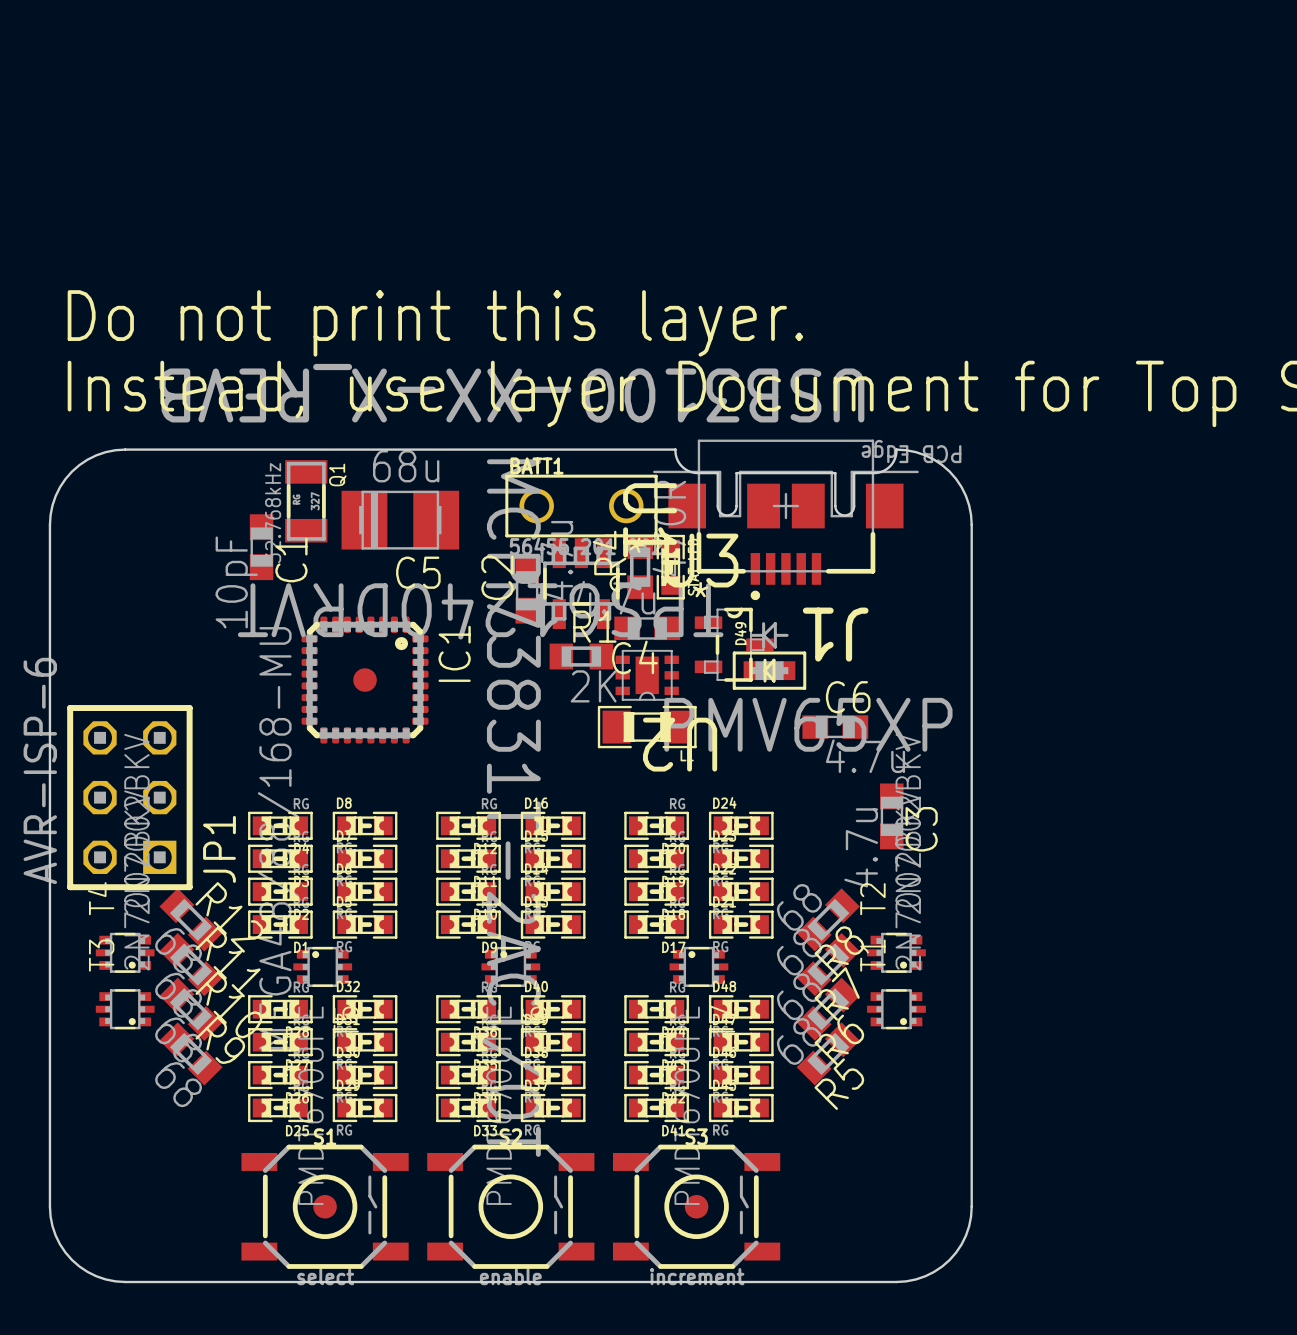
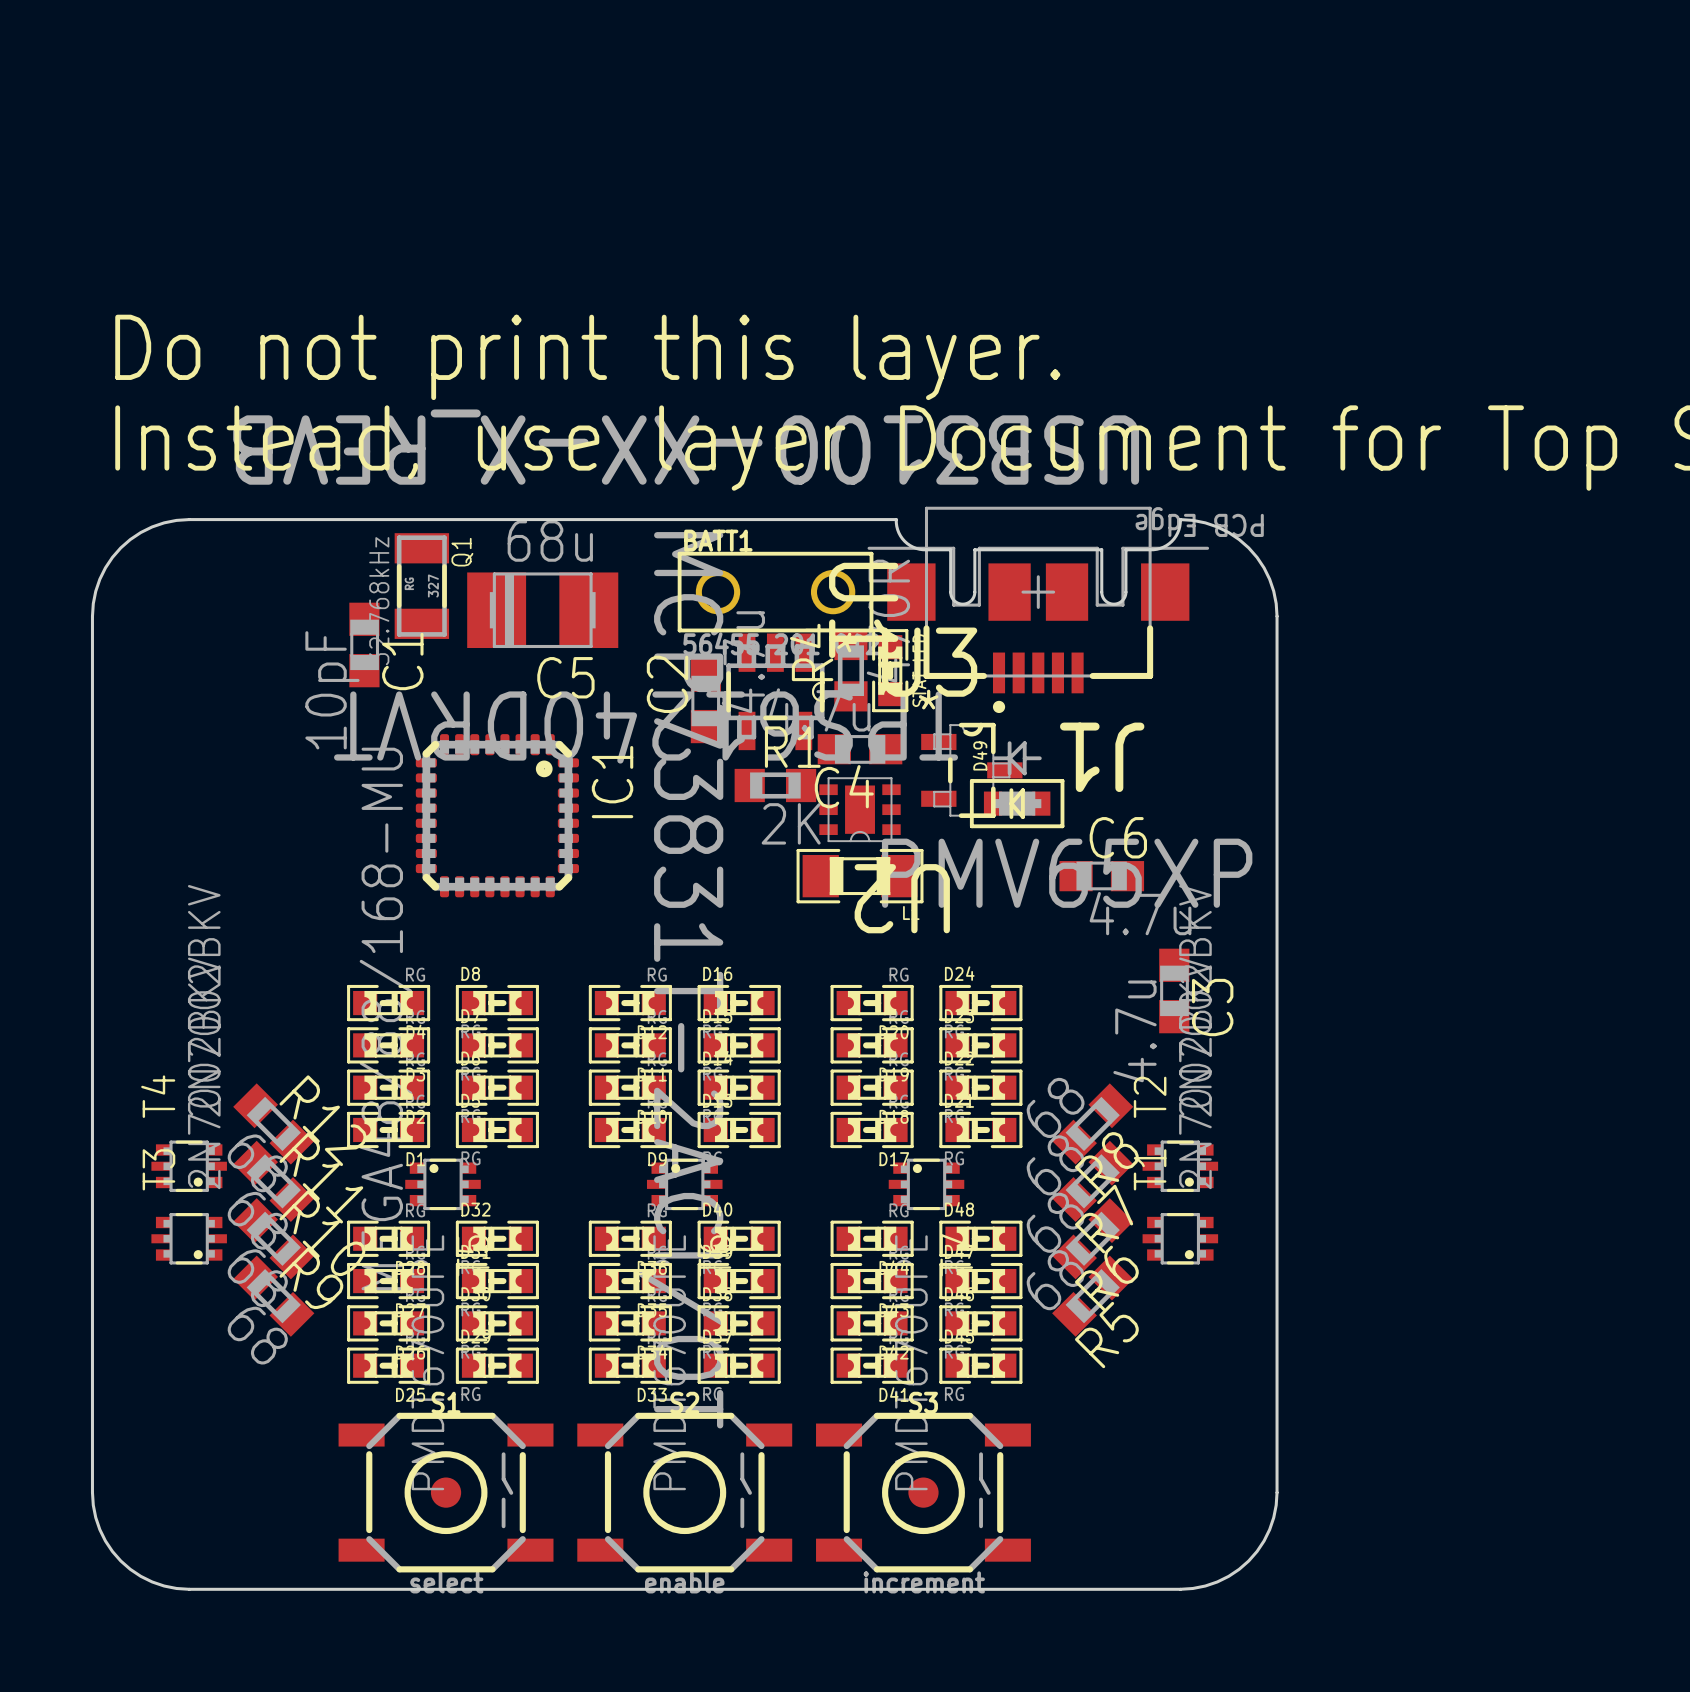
part: (365, 680) -> none
JP1: AVR-ISP-6 (129, 797) -> none

